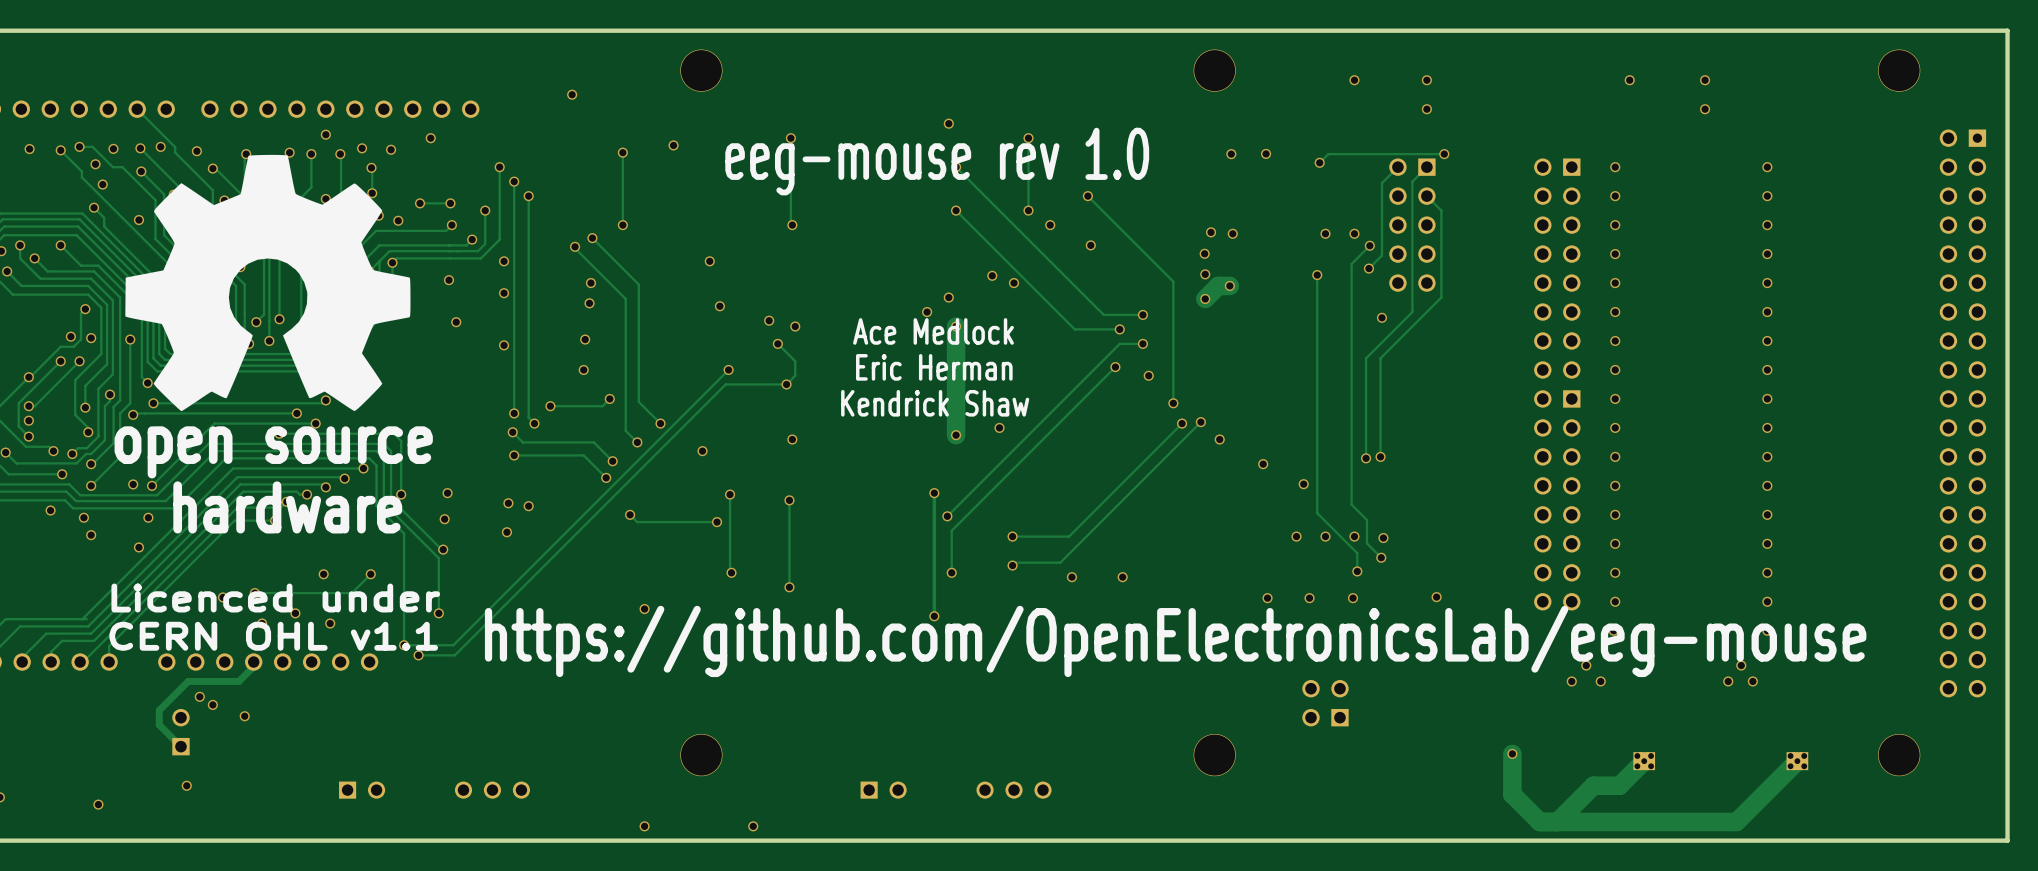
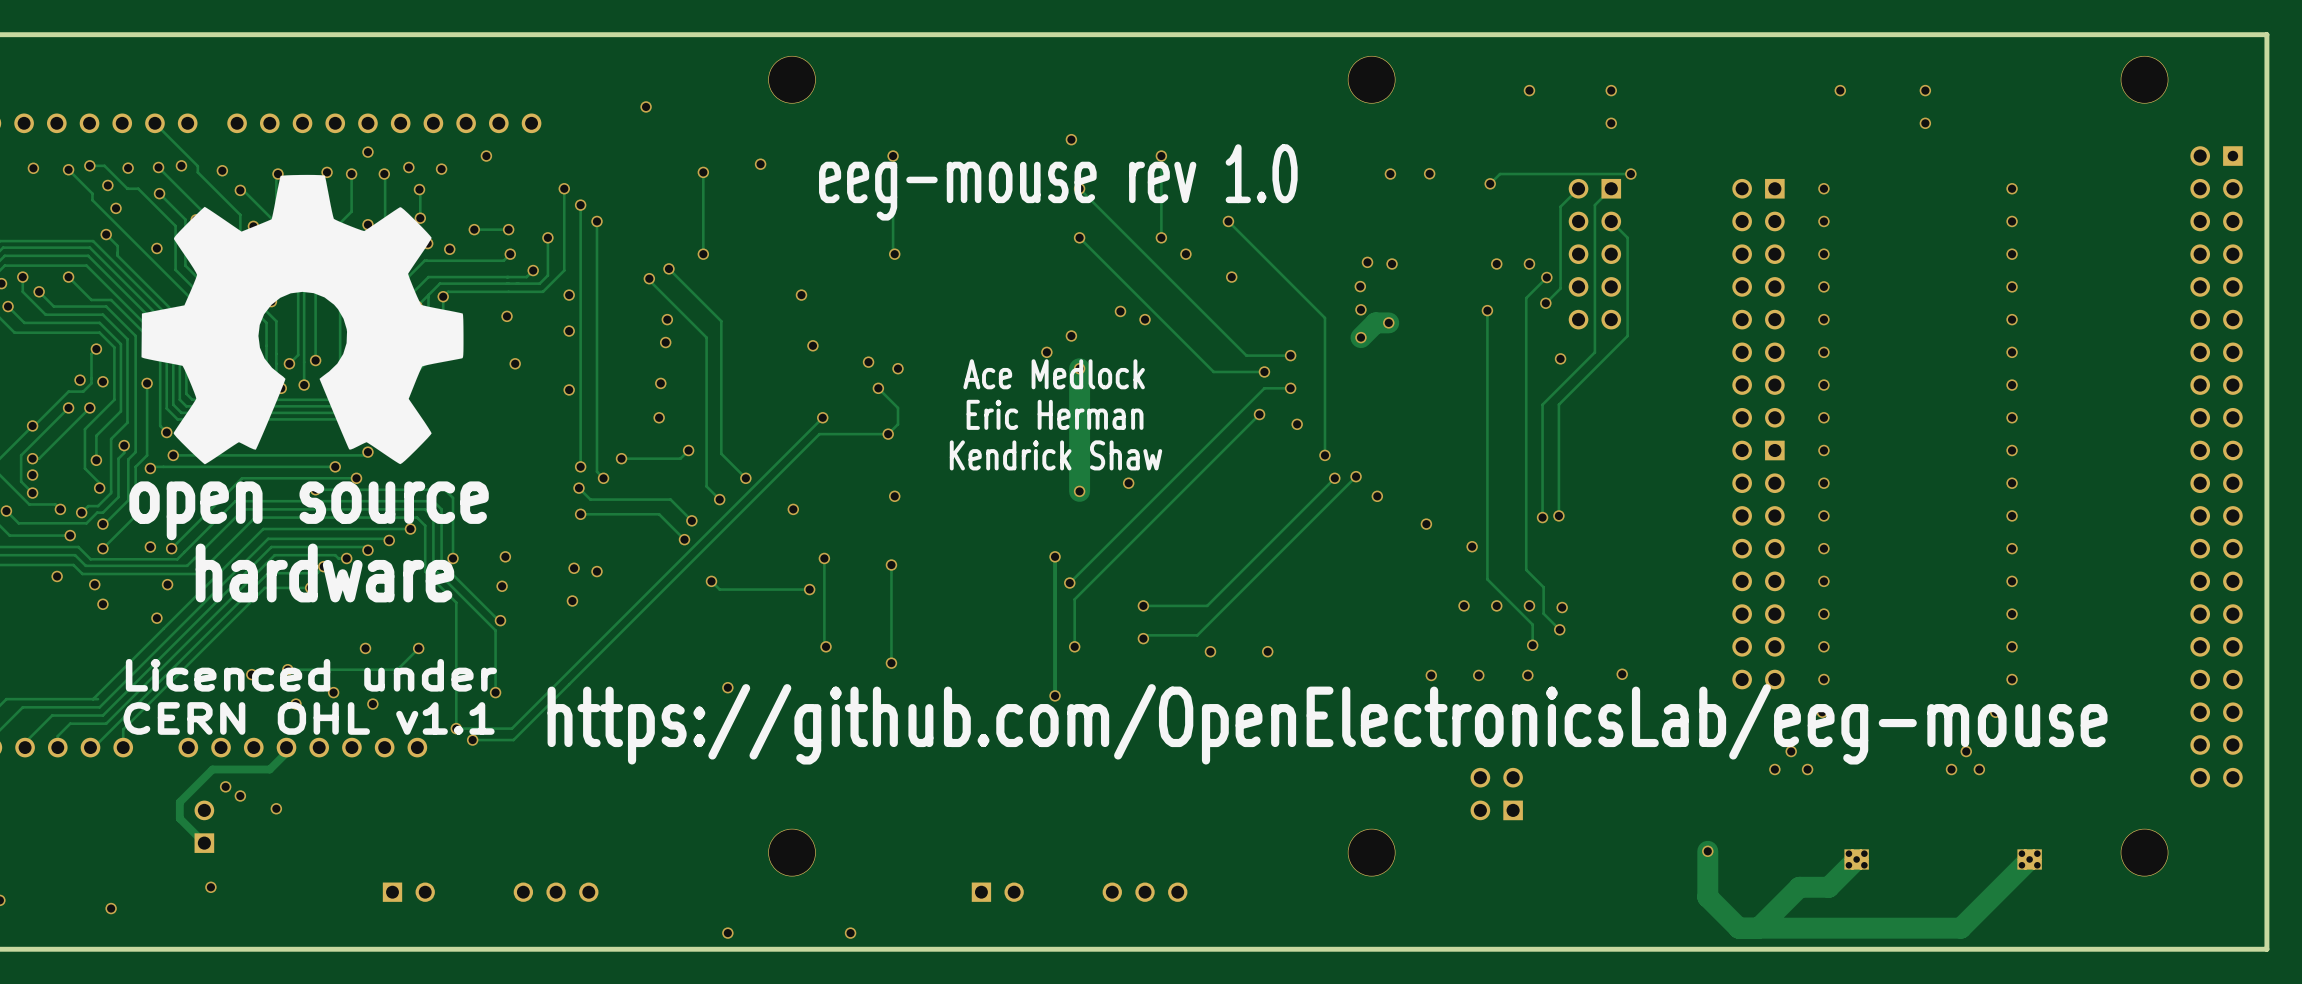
via position: (1767, 167) -> (2012, 188)
via position: (1767, 196) -> (2012, 221)
via position: (1767, 225) -> (2012, 254)
via position: (1767, 254) -> (2012, 286)
via position: (1767, 283) -> (2012, 319)
via position: (1767, 312) -> (2012, 352)
via position: (1767, 341) -> (2012, 385)
via position: (1767, 369) -> (2012, 417)
via position: (1767, 398) -> (2012, 450)
via position: (1767, 427) -> (2012, 483)
via position: (1767, 456) -> (2012, 515)
via position: (1767, 485) -> (2012, 548)
via position: (1767, 514) -> (2012, 581)
via position: (1767, 543) -> (2012, 614)
via position: (1767, 572) -> (2012, 646)
via position: (1767, 601) -> (2012, 679)

